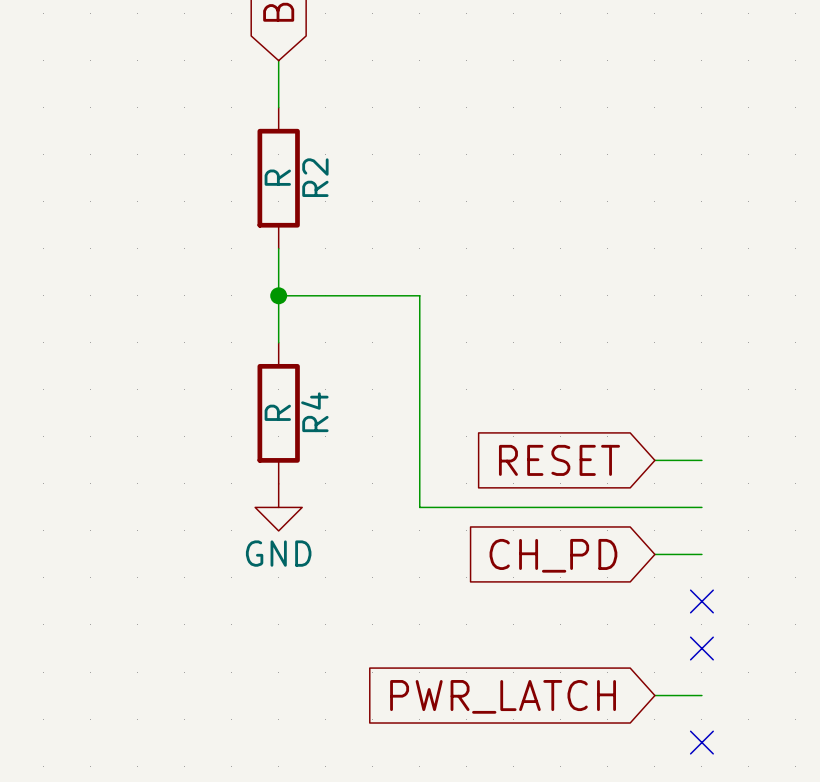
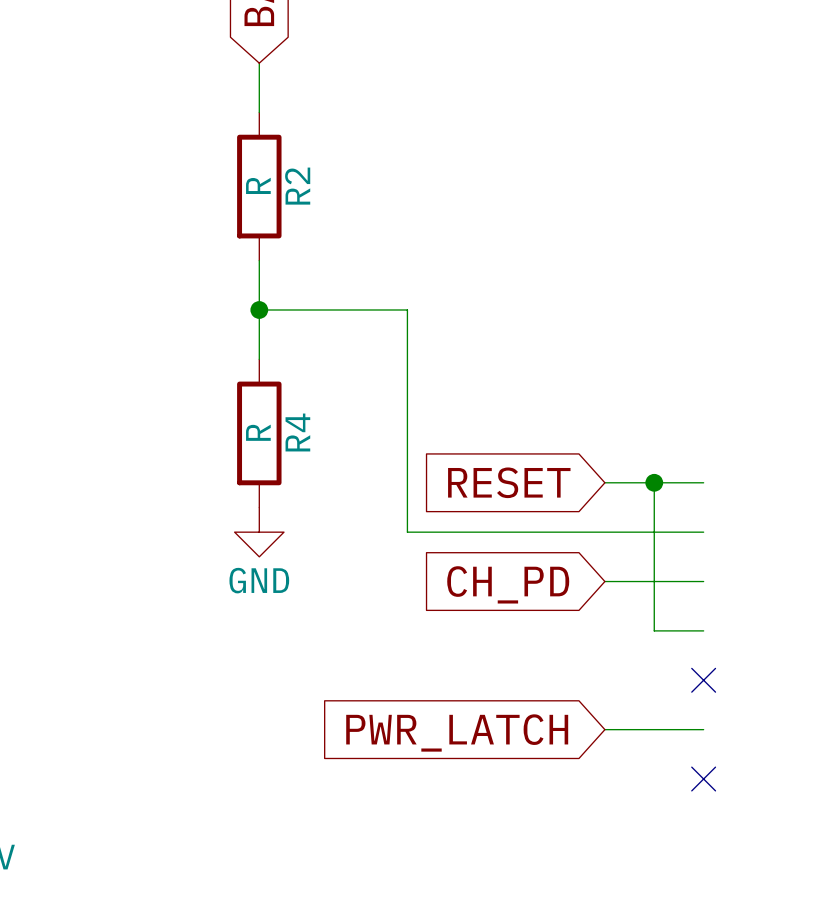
global label position: RESET (559, 460) -> RESET (509, 482)
wire: none -> (604, 482) (654, 482) (654, 630) (703, 630)
junction: none -> (654, 482)
wire: none -> (604, 581) (654, 581)
global label position: CH_PD (553, 555) -> CH_PD (508, 584)
no-connect mark: (701, 601) -> none
wire: none -> (604, 729) (654, 729)
global label position: PWR_LATCH (503, 696) -> PWR_LATCH (457, 732)

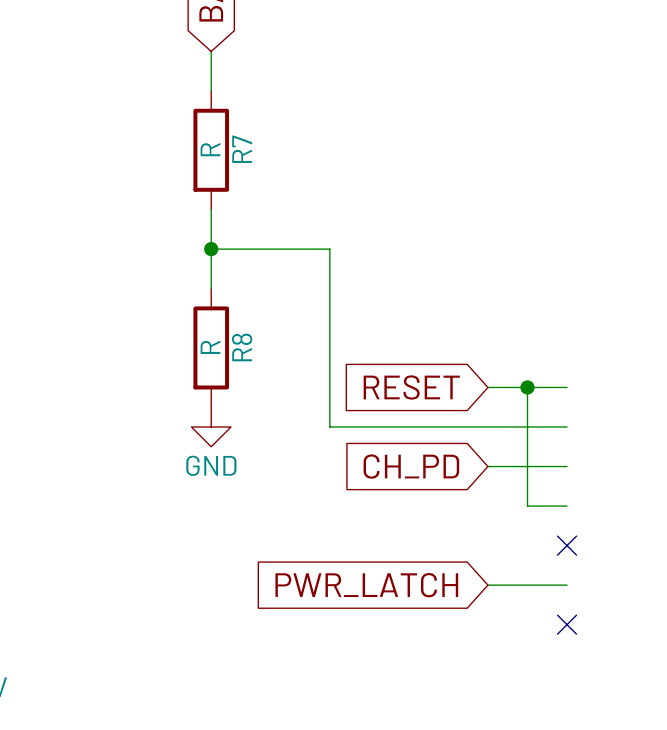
R2 name: R2 (297, 186) -> R7 (242, 149)
R4 name: R4 (297, 432) -> R8 (242, 347)

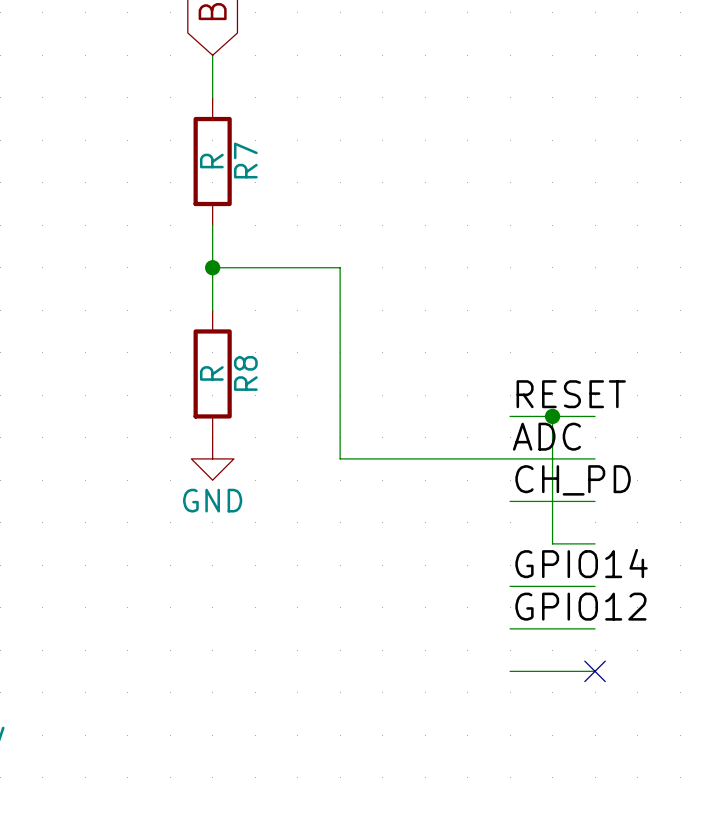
label: none -> RESET (571, 394)
global label: RESET (411, 387) -> none
label: none -> ADC (546, 436)
label: none -> CH_PD (573, 480)
global label: CH_PD (411, 466) -> none
label: none -> GPIO14 (581, 563)
wire: none -> (510, 586) (595, 586)
no-connect mark: (567, 545) -> none
label: none -> GPIO12 (580, 606)
global label: PWR_LATCH (366, 585) -> none
wire: none -> (510, 671) (595, 671)

